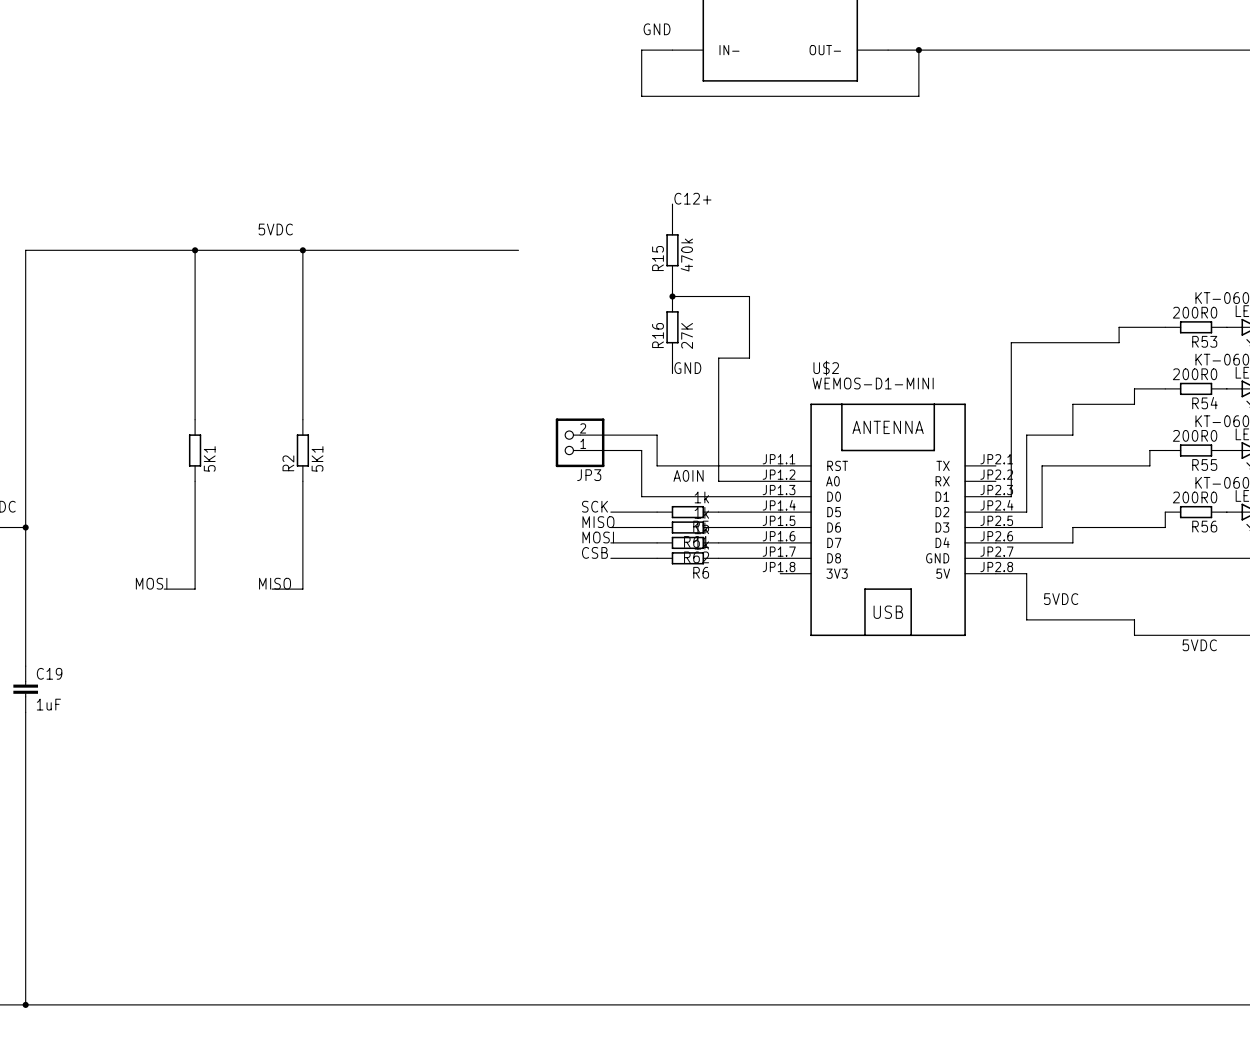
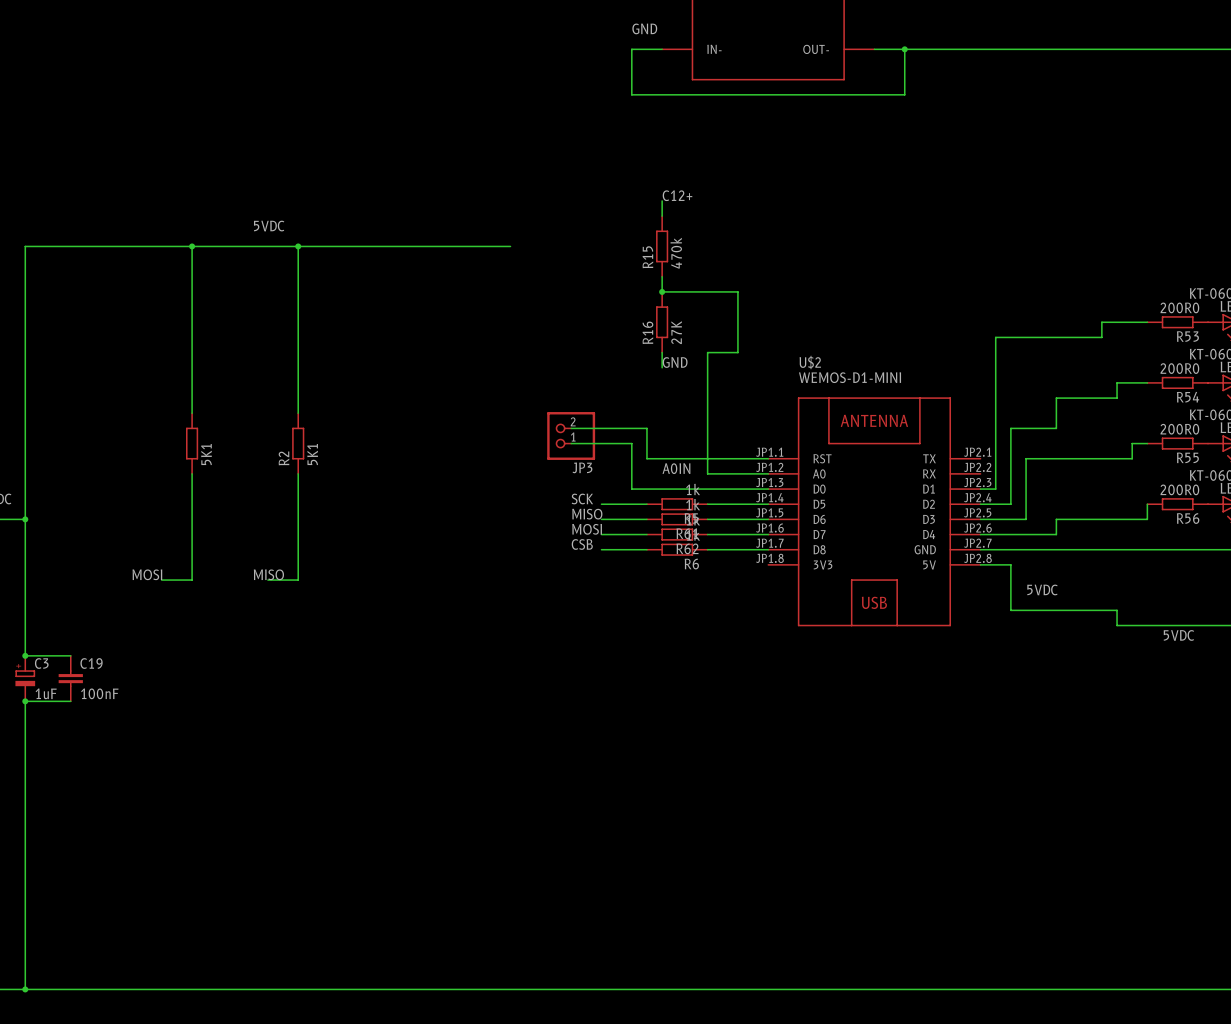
wire: none -> (25, 655) (70, 655)
junction: none -> (25, 655)
C19 position: (25, 689) -> (70, 678)
C3: none -> 1uF (25, 678)
C19 value: 1uF (48, 704) -> 100nF (99, 693)
wire: none -> (25, 701) (70, 701)
junction: none -> (25, 701)

